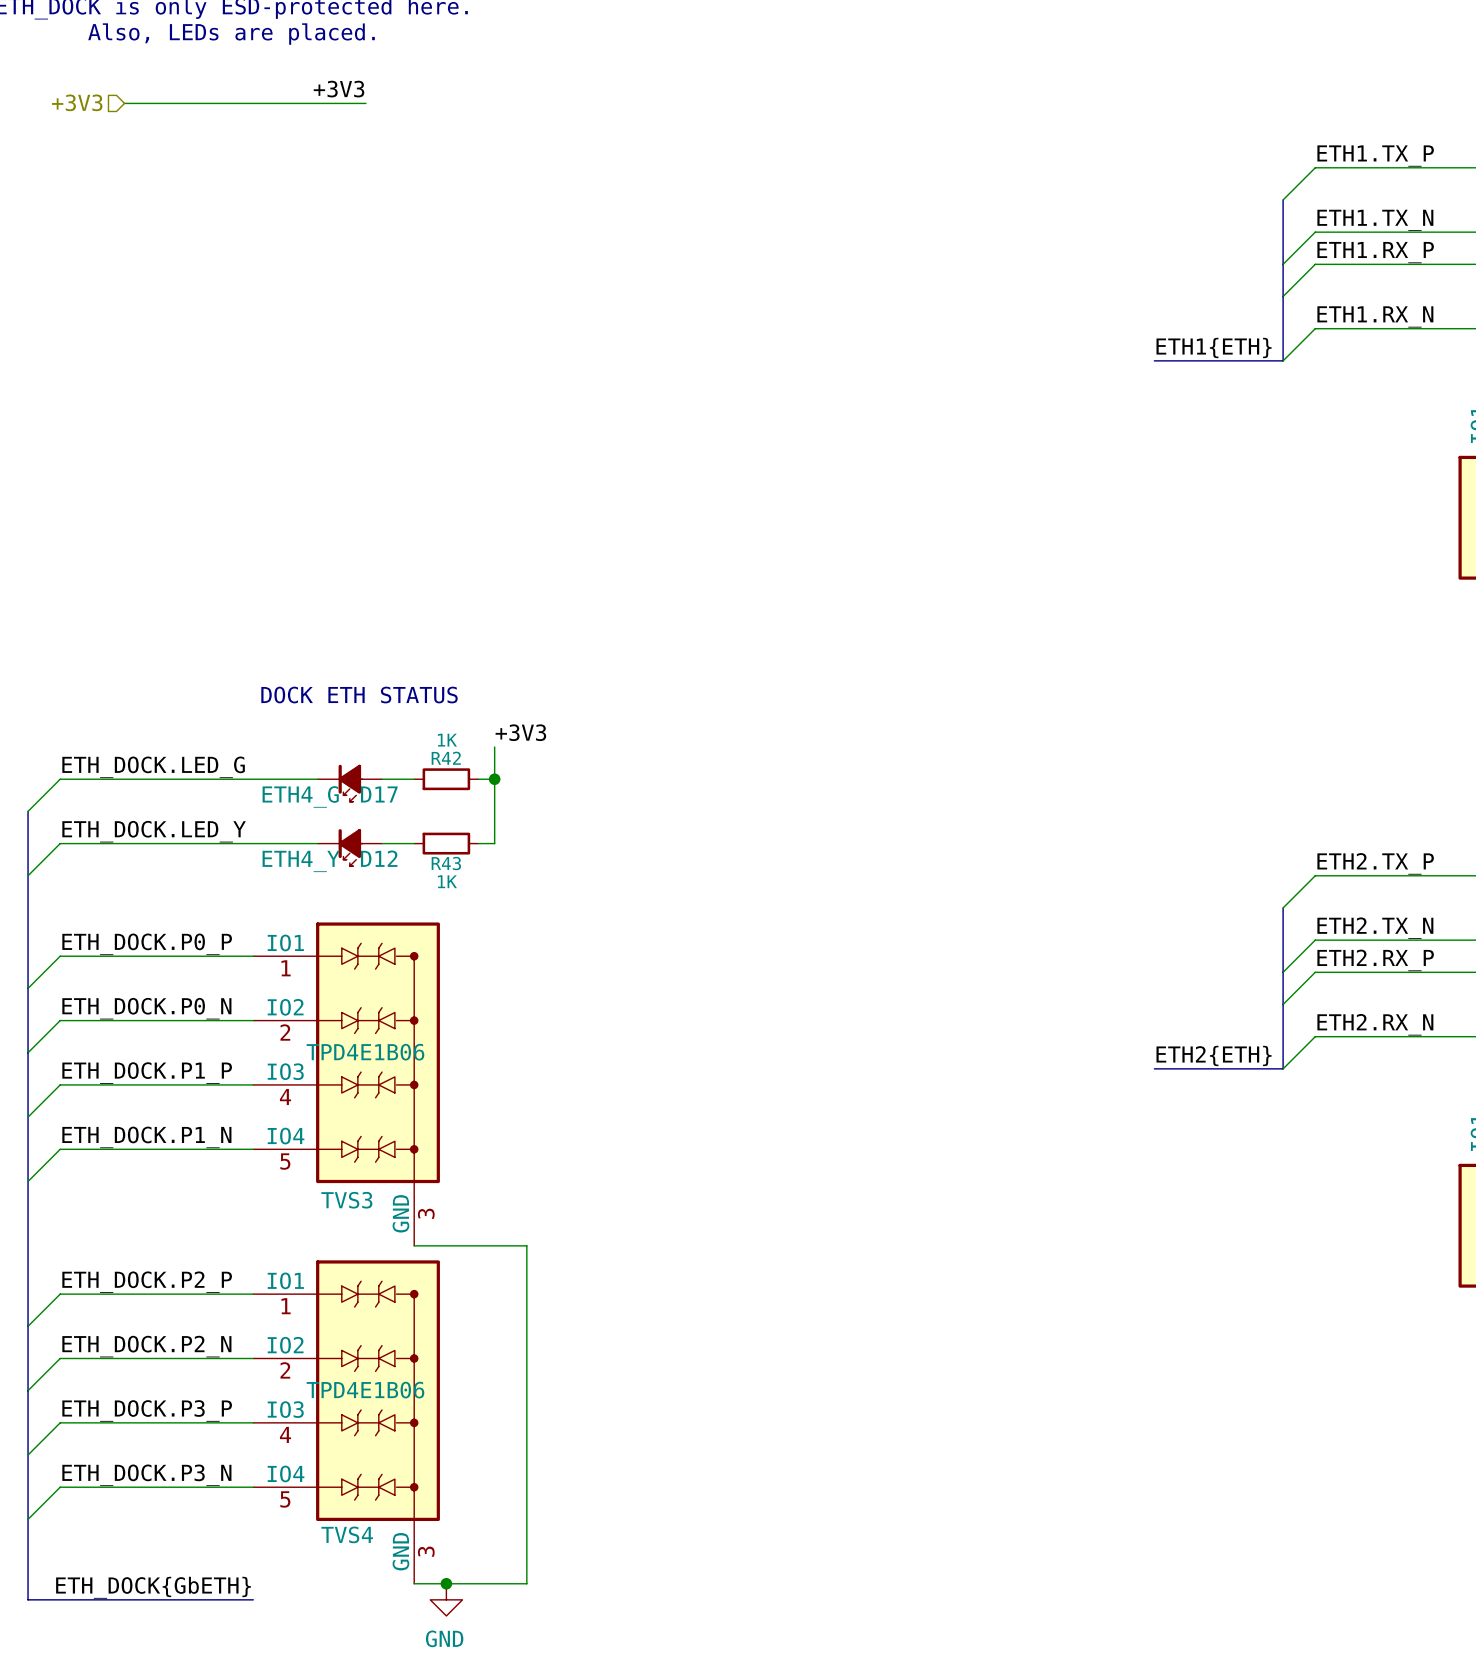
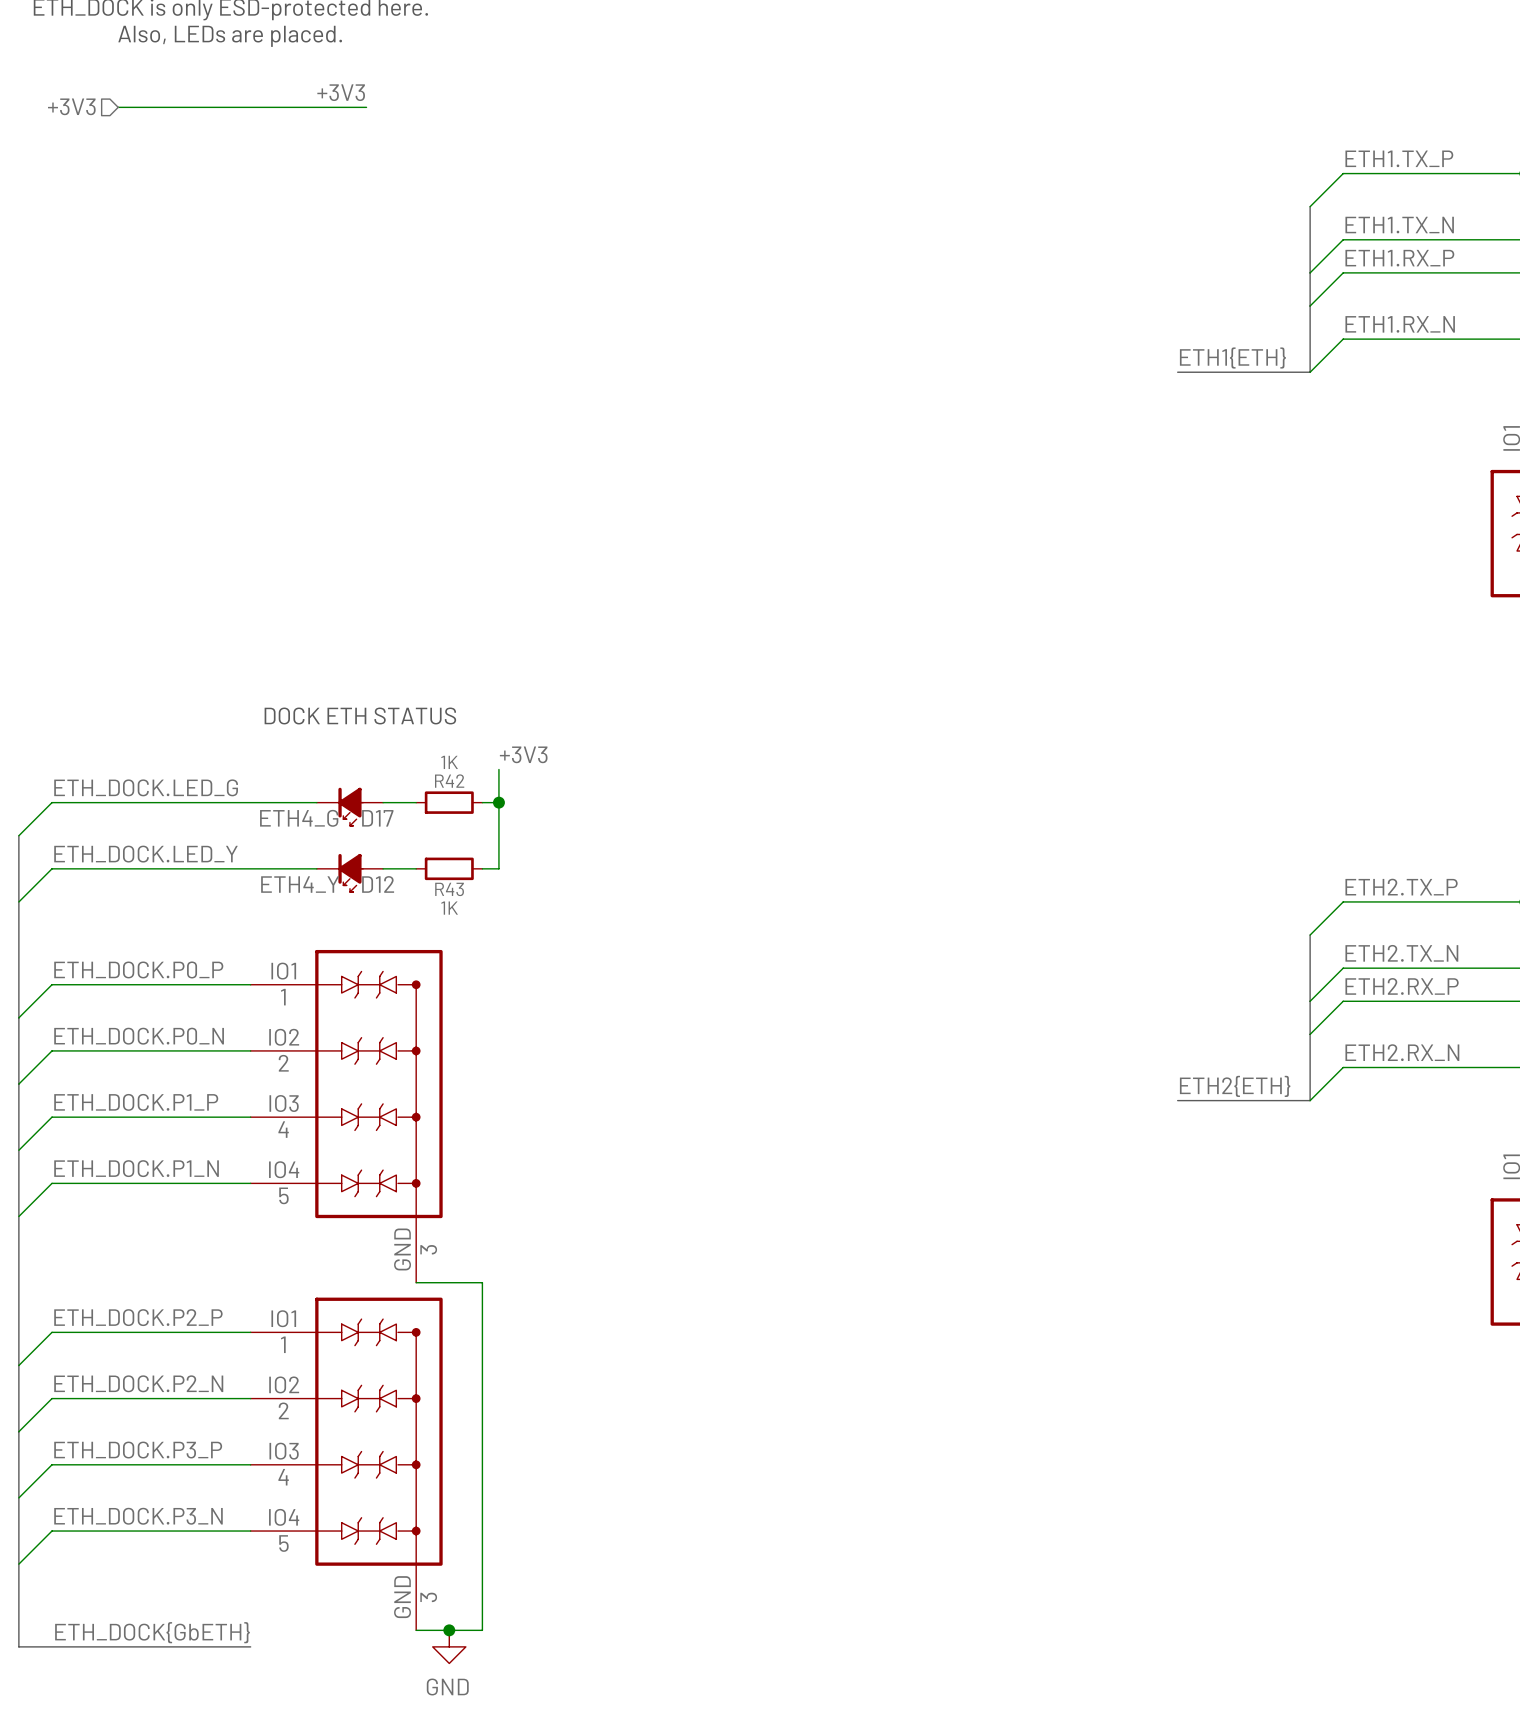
TVS3 value: TPD4E1B06 (365, 1052) -> none
TVS3 name: TVS3 (346, 1200) -> none
wire: (478, 1245) (526, 1245) (526, 1583) (478, 1583) -> (482, 1282) (482, 1630)
TVS4 value: TPD4E1B06 (365, 1390) -> none
TVS4 name: TVS4 (347, 1534) -> none

